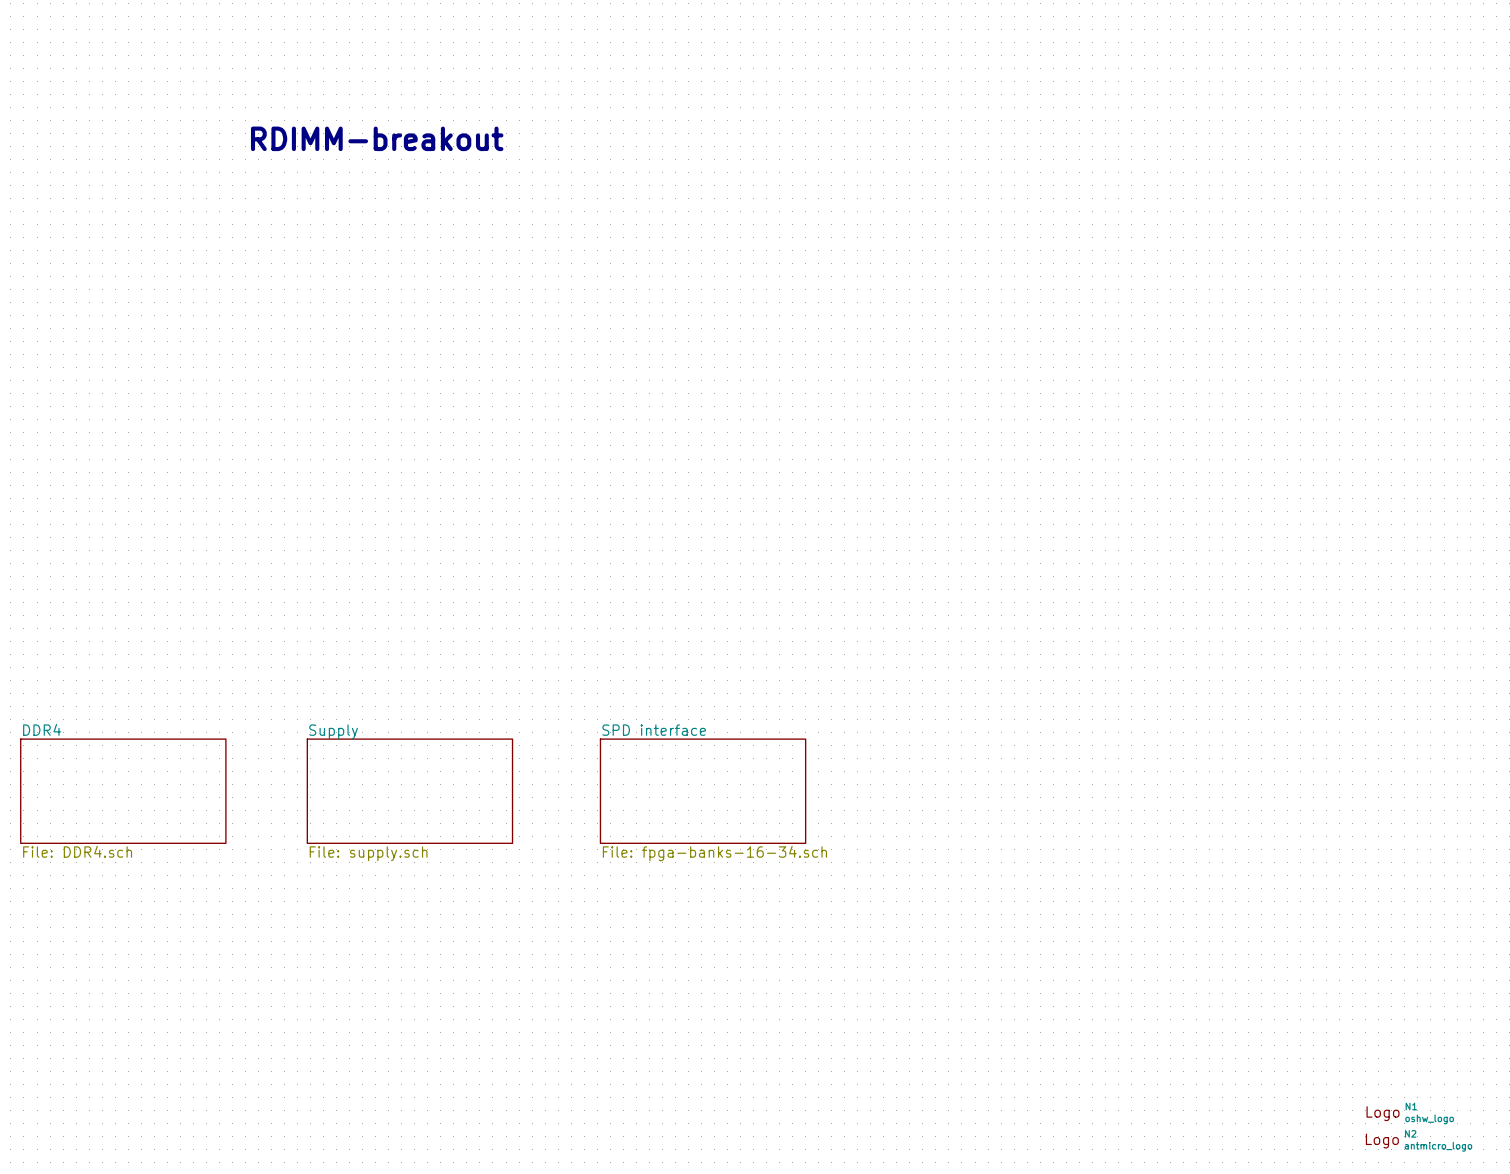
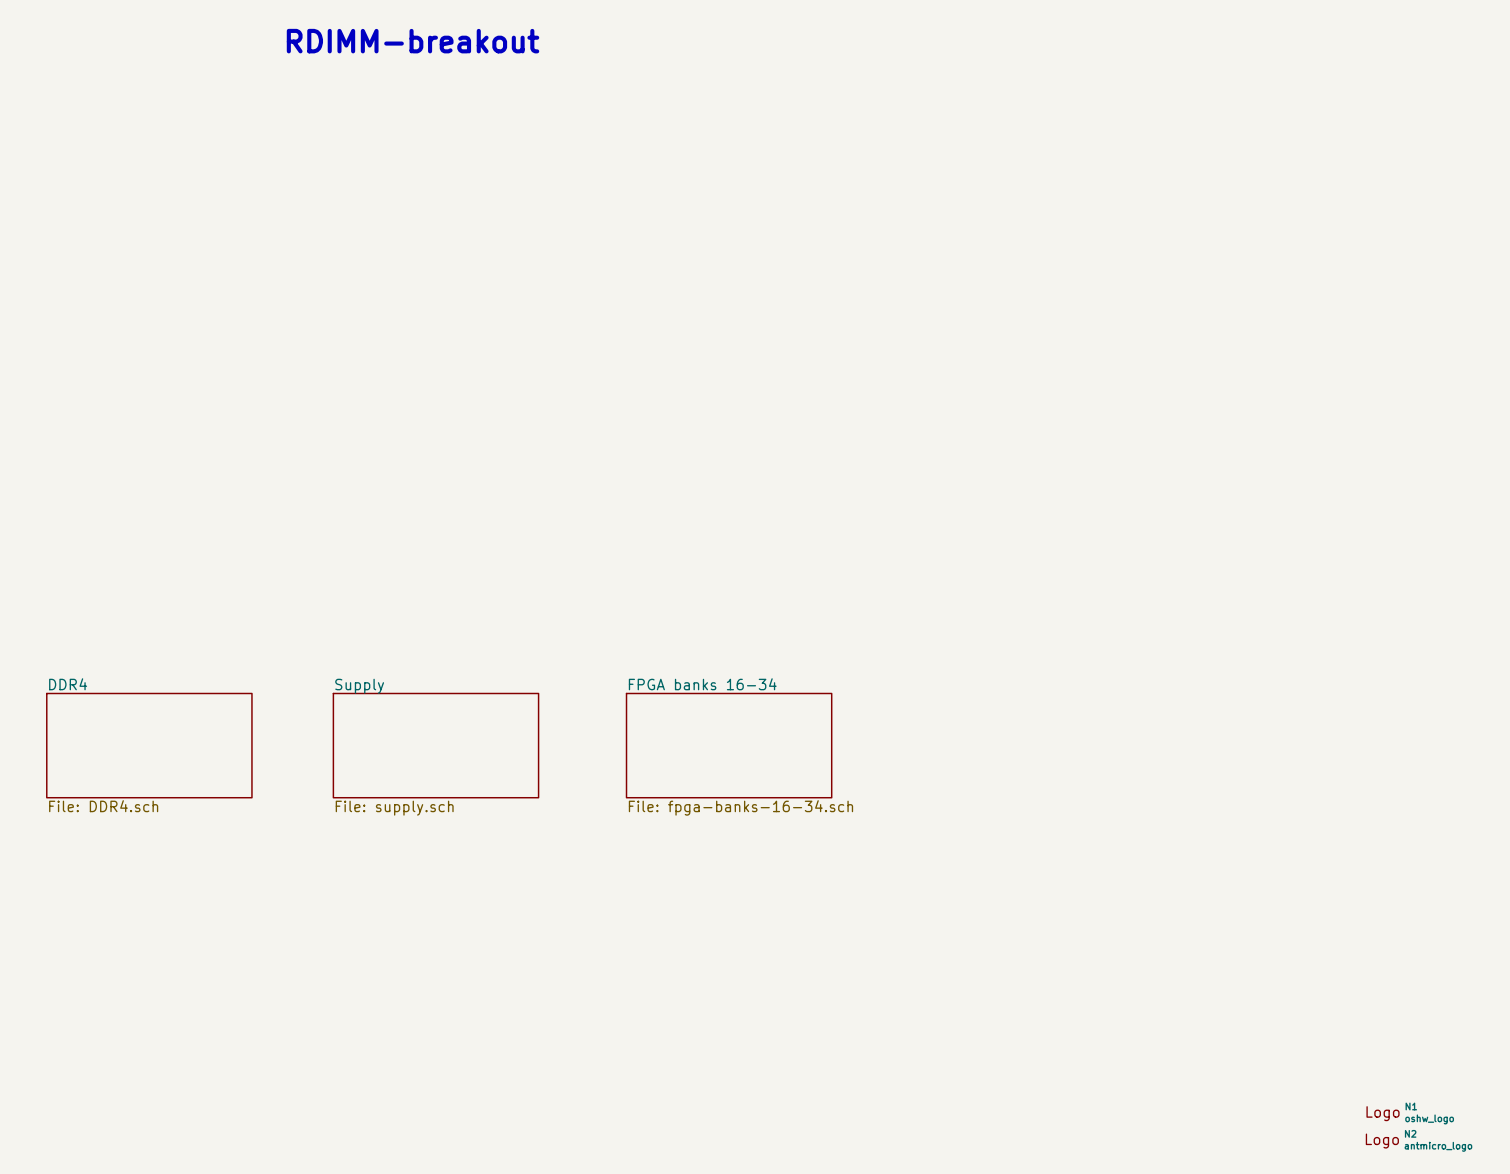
text position: RDIMM-breakout (377, 138) -> RDIMM-breakout (413, 41)
sheet FPGA banks 16-34: none -> File: fpga-banks-16-34.sch (729, 745)
sheet DDR4 position: (123, 791) -> (149, 745)
sheet Supply position: (409, 791) -> (435, 745)
sheet SPD interface: File: fpga-banks-16-34.sch (703, 791) -> none

